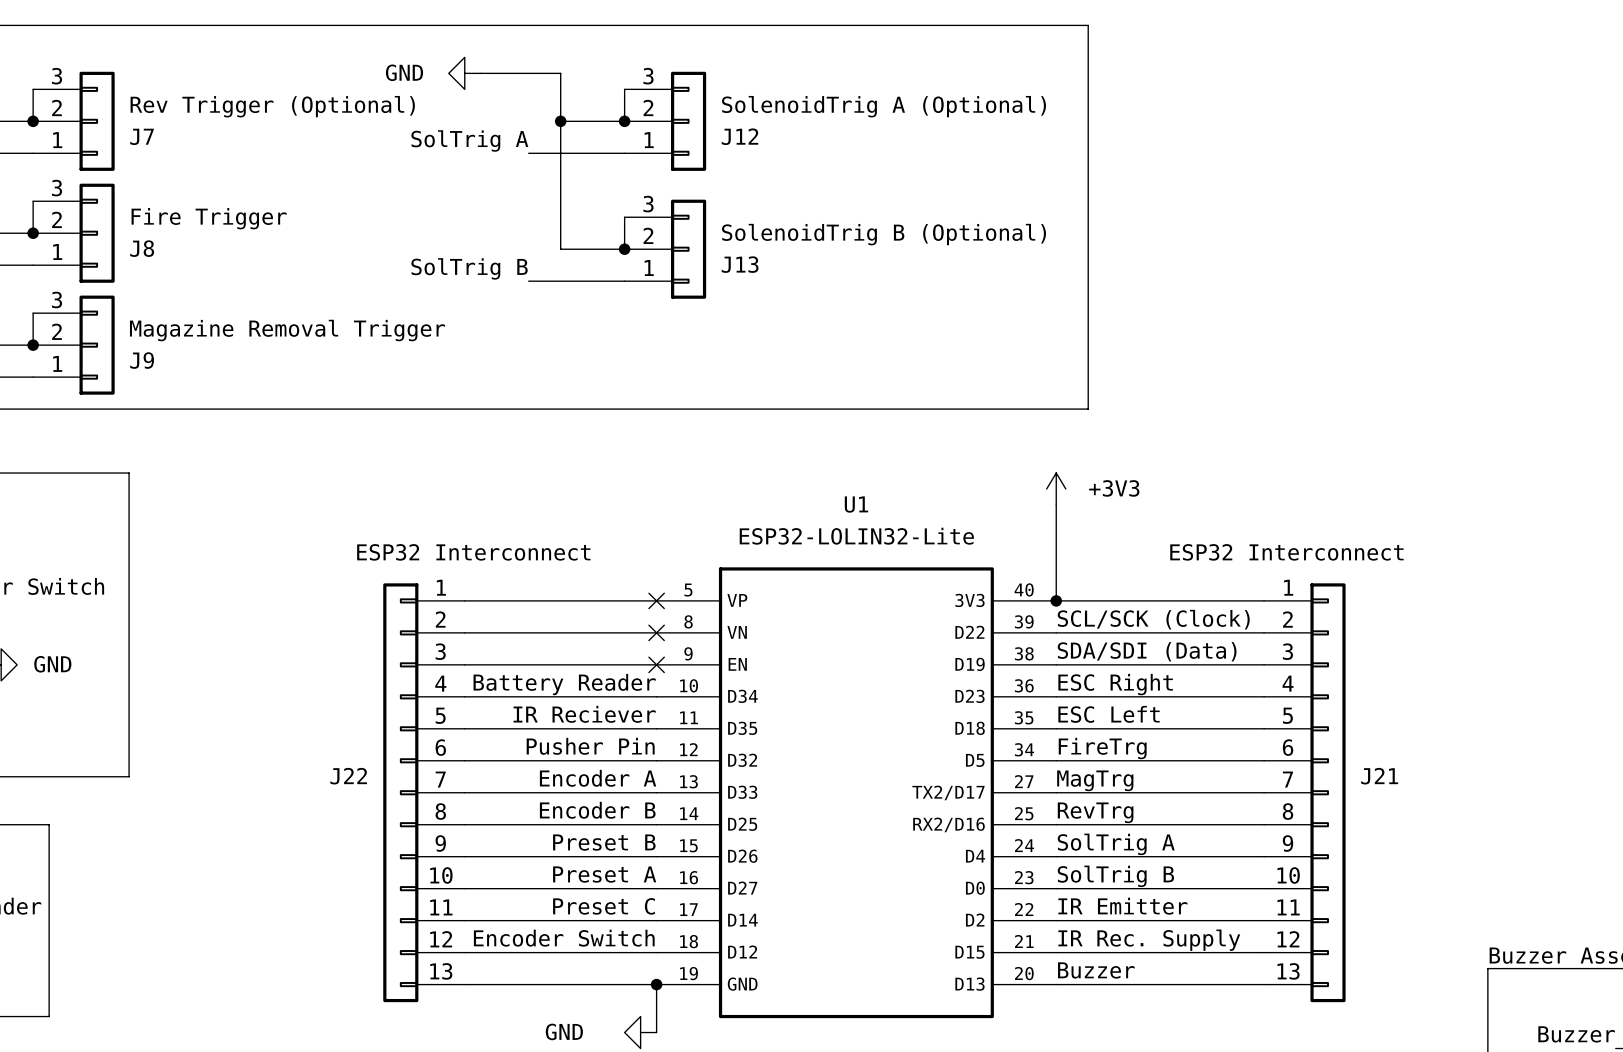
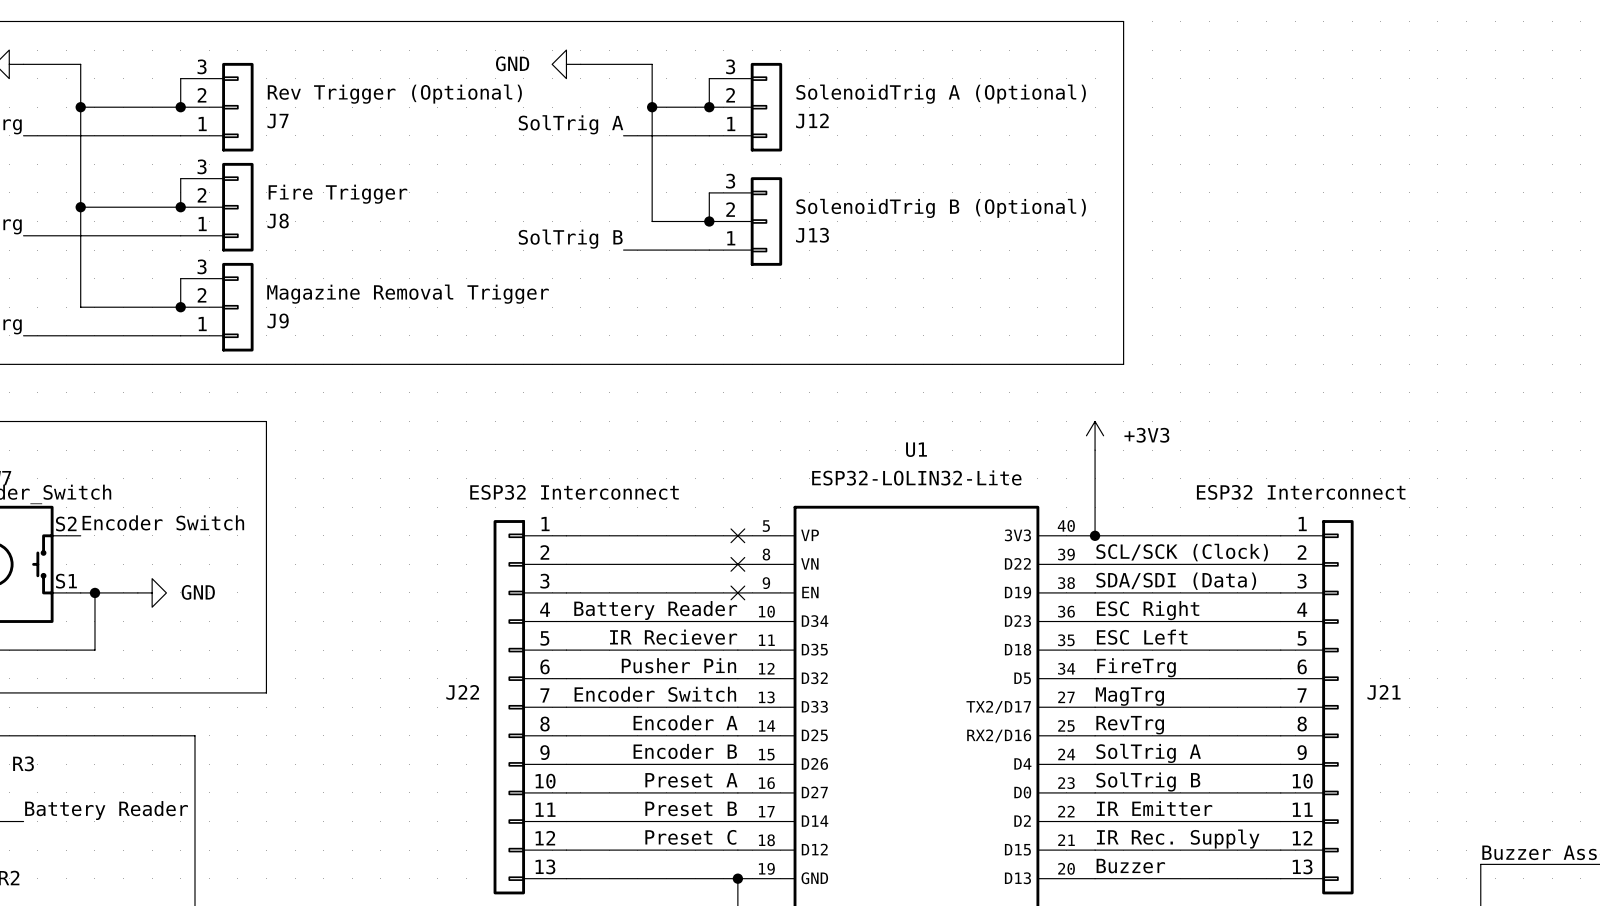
label: Encoder A (598, 778) -> Encoder Switch (655, 694)
label: Encoder B (597, 810) -> Encoder A (685, 722)
label: Preset B (604, 842) -> Encoder B (685, 751)
label: Preset C (603, 906) -> Preset B (691, 808)
label: Encoder Switch (564, 938) -> Preset C (690, 837)

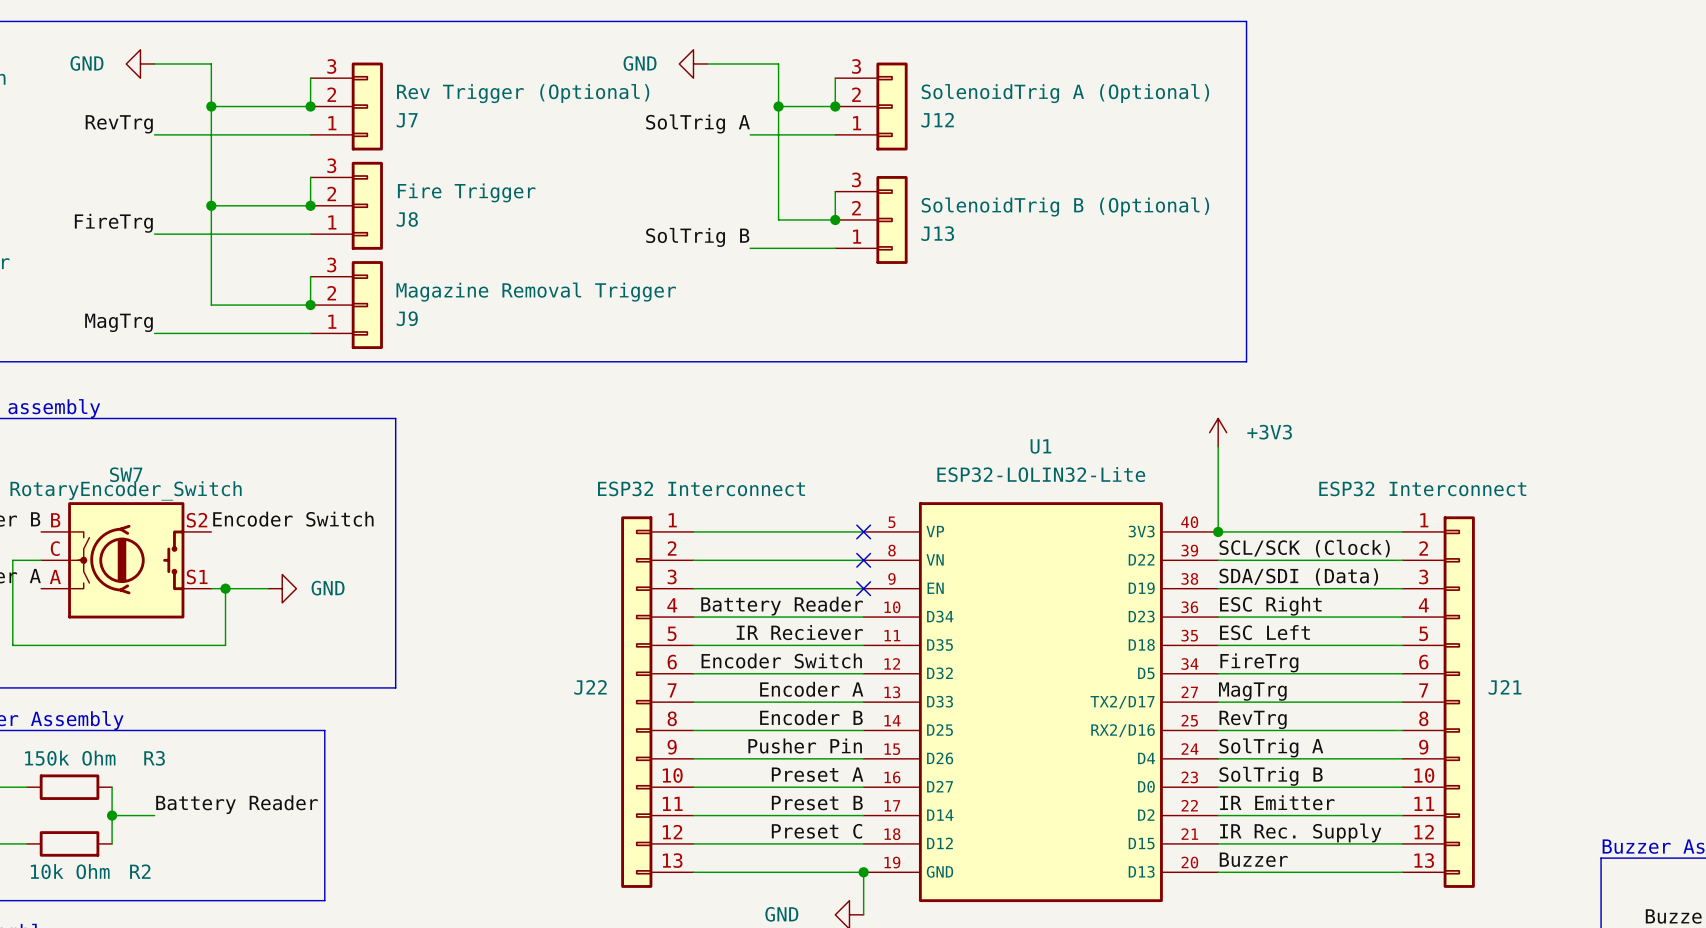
label: Pusher Pin (678, 665) -> Encoder Switch (781, 660)
label: Encoder Switch (655, 694) -> Encoder A (811, 689)
label: Encoder A (685, 722) -> Encoder B (811, 717)
label: Encoder B (685, 751) -> Pusher Pin (805, 746)

